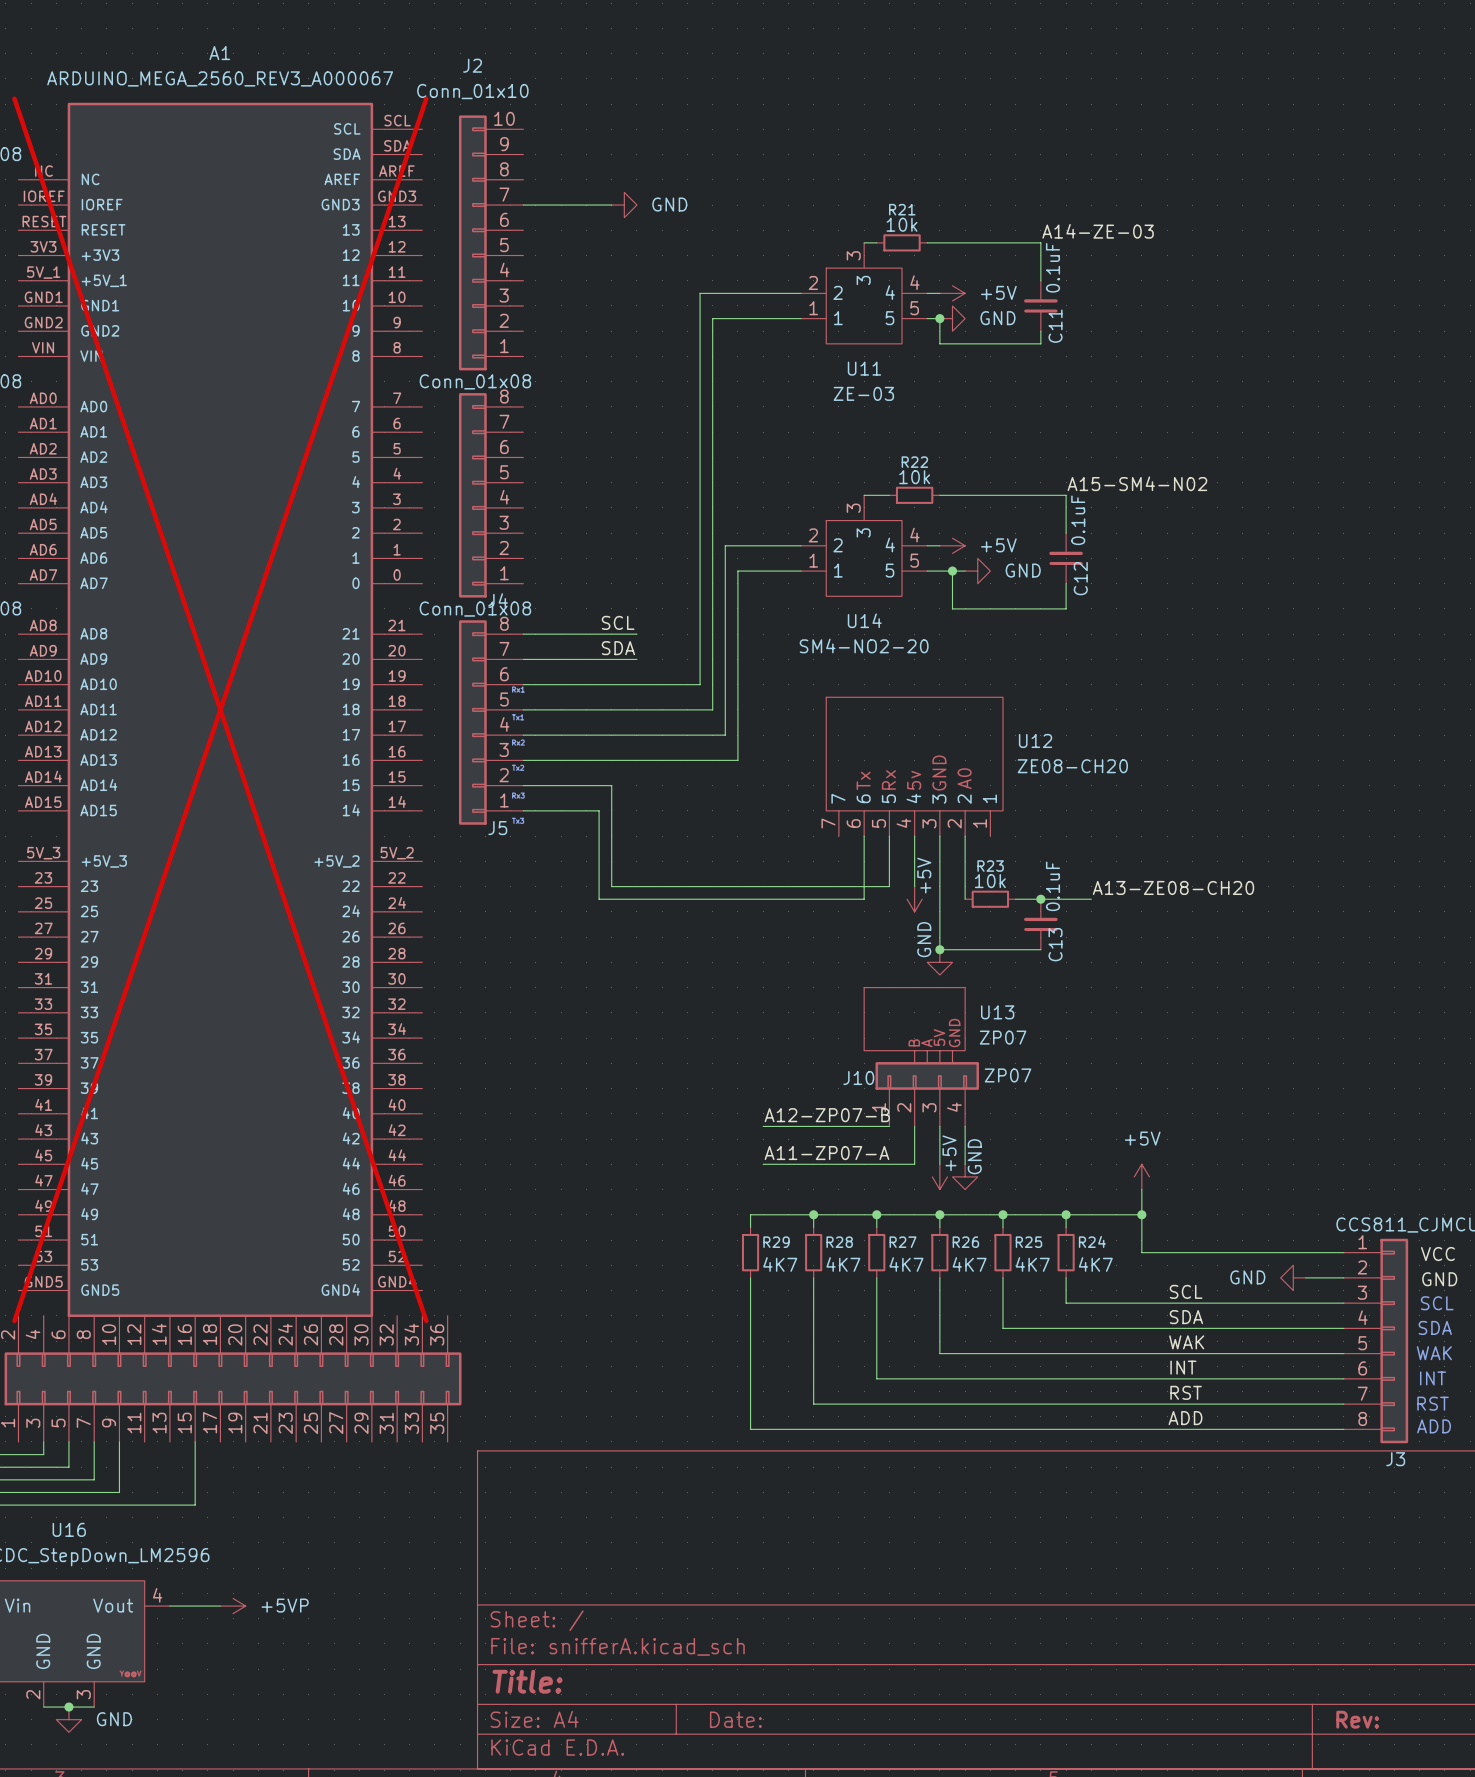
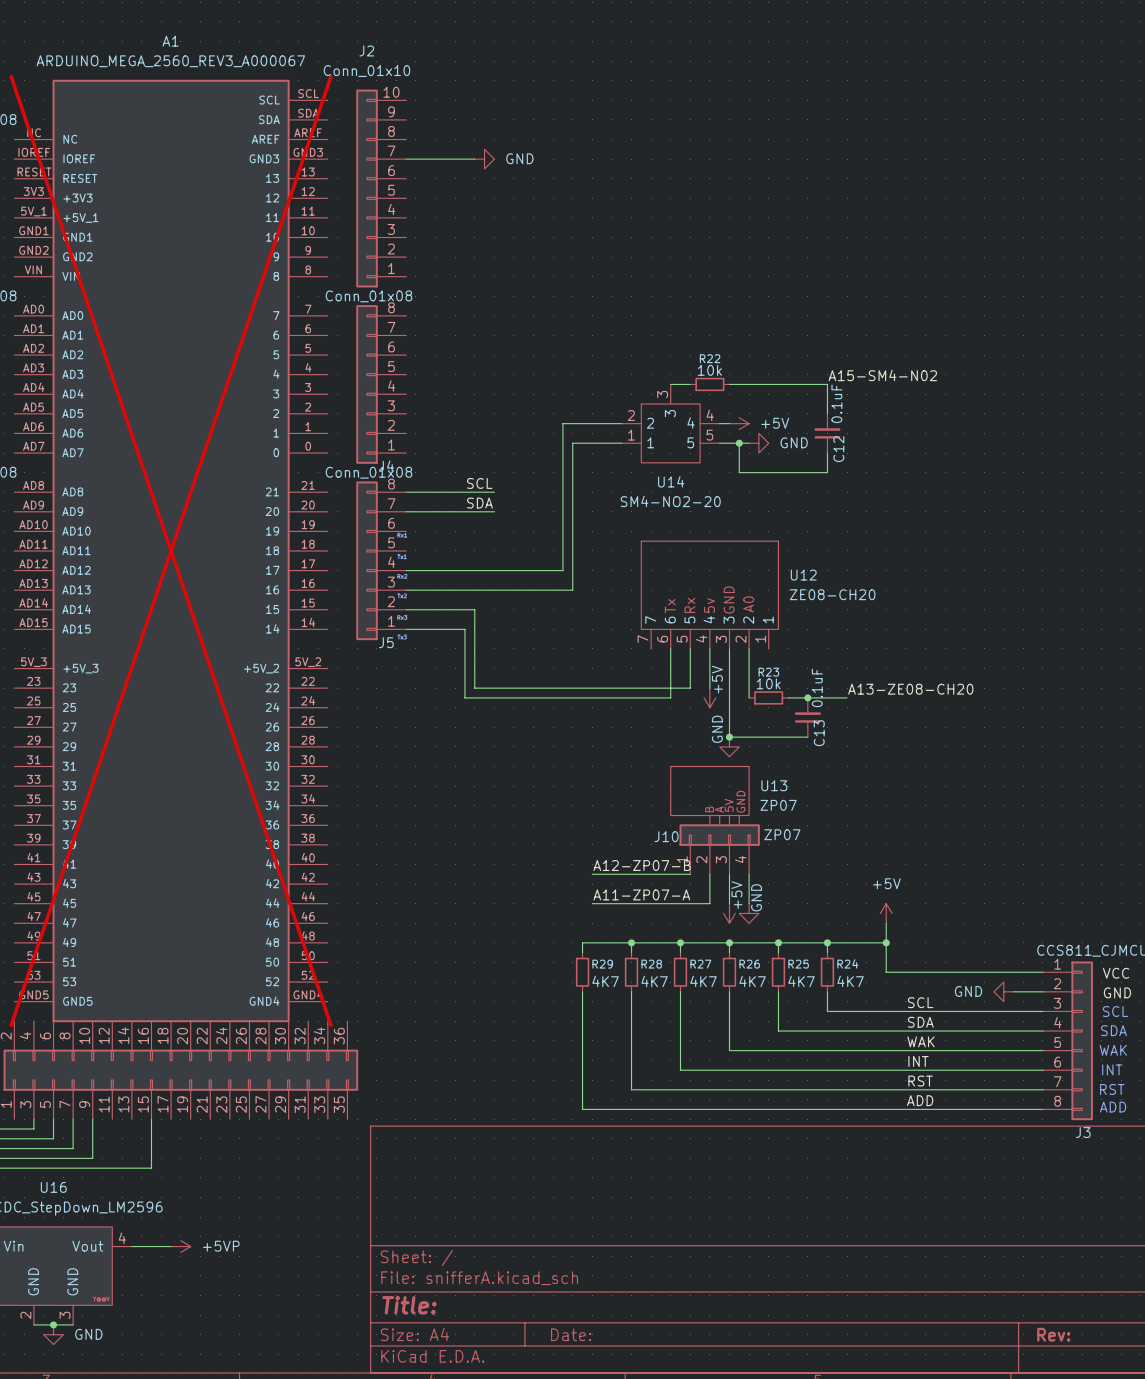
label: A14-ZE-03 (1098, 231) -> none
wire: (864, 242) (876, 242) -> none
R21: 10k (902, 242) -> none
wire: (927, 242) (1040, 242) (1040, 280) -> none
wire: (801, 293) (700, 293) (700, 684) (523, 684) -> none
U11: ZE-03 (864, 293) -> none
wire: (927, 293) (939, 293) -> none
power symbol: +5V (952, 293) -> none
C11: 0.1uF (1040, 305) -> none
wire: (801, 318) (712, 318) (712, 709) (523, 709) -> none
wire: (927, 318) (939, 318) (939, 343) (1040, 343) (1040, 331) -> none
junction: (939, 318) -> none
power symbol: GND (952, 318) -> none

